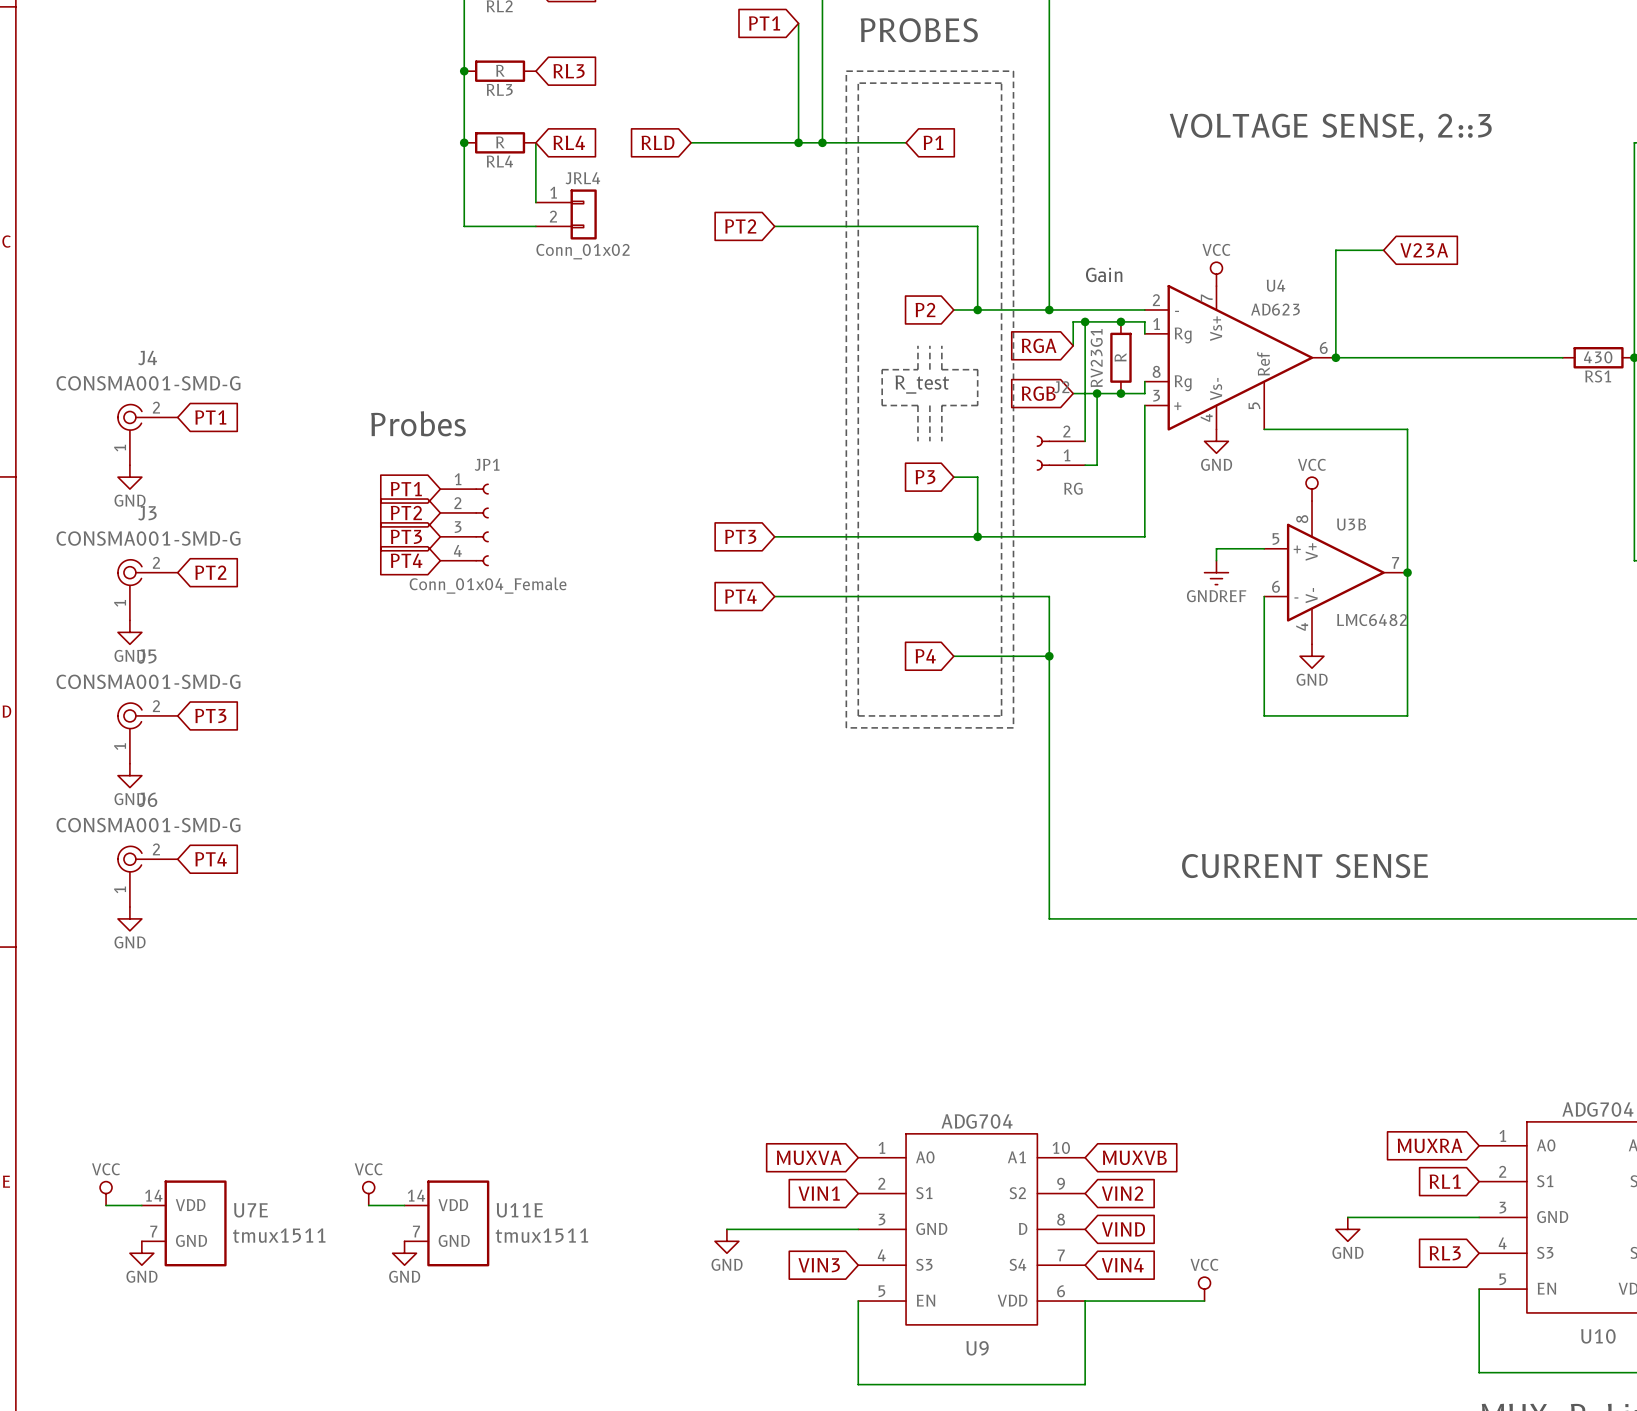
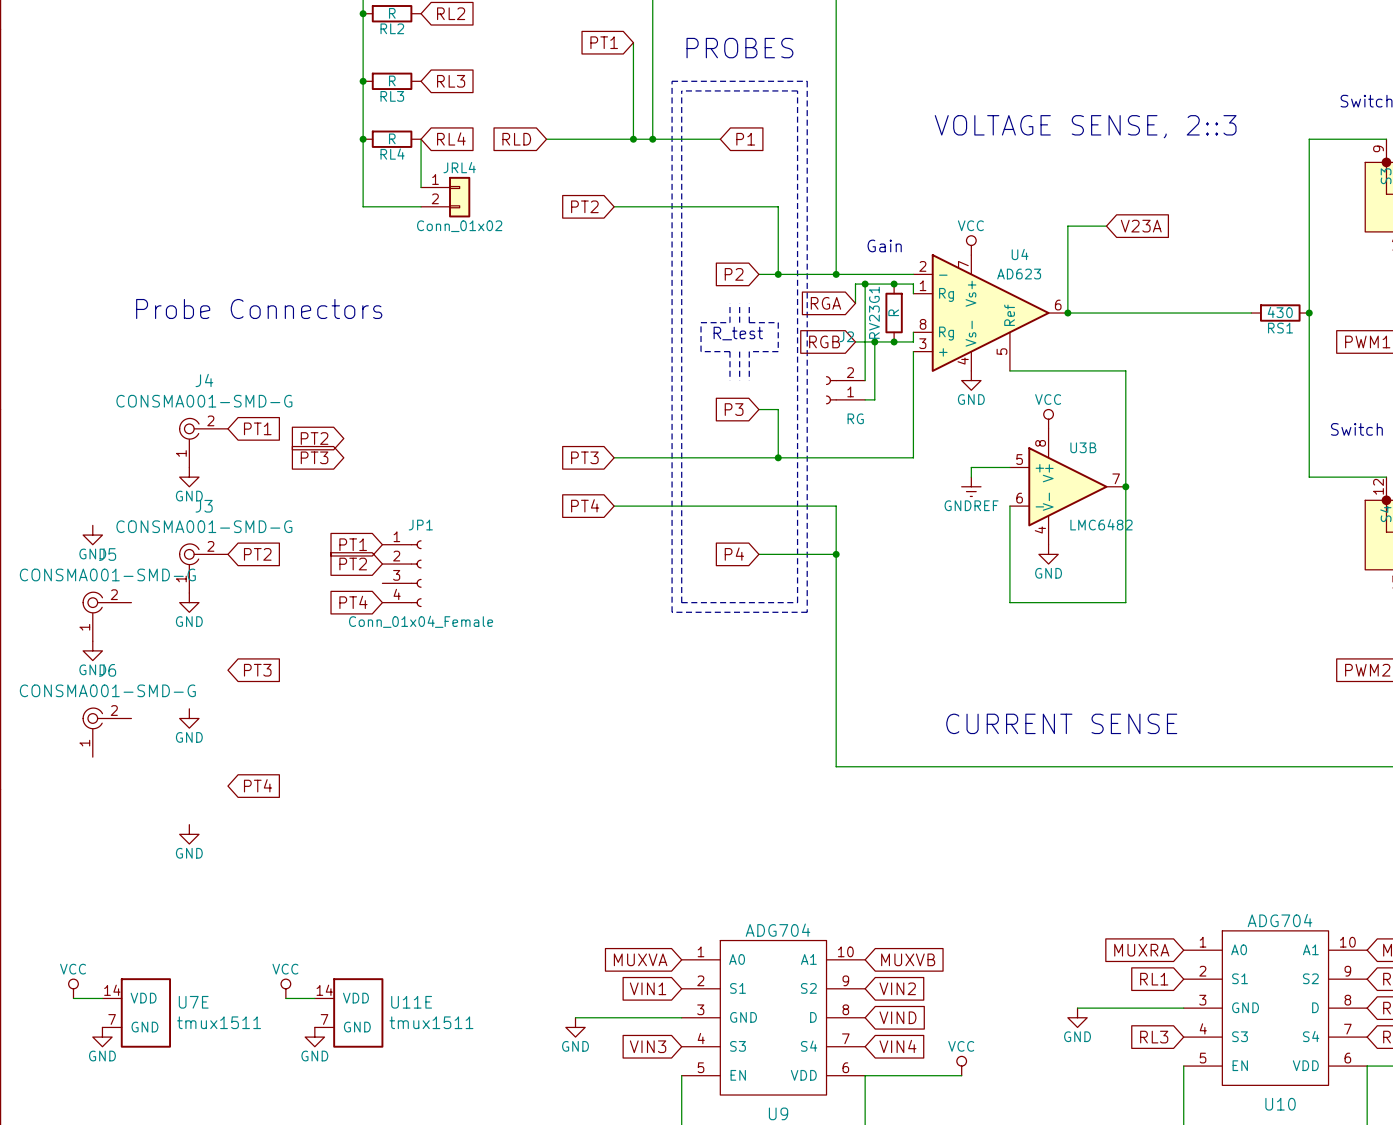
text: none -> Probe Connectors (259, 308)
global label: PT1 (210, 417) -> none
text: Probes (418, 423) -> none
J4 position: (147, 434) -> (203, 442)
power symbol: GND (129, 477) -> none
global label rotation: 0° (406, 489) -> 180° (257, 428)
JP1 position: (464, 524) -> (402, 573)
power symbol: none -> GND (189, 477)
global label position: PT4 (406, 560) -> PT4 (353, 602)
global label position: PT2 (210, 572) -> PT2 (257, 554)
J3 position: (147, 590) -> (203, 568)
global label: none -> PT1 (353, 544)
global label: none -> PT2 (353, 564)
global label position: PT3 (210, 715) -> PT3 (257, 670)
power symbol: none -> GND (189, 602)
global label position: PT4 (211, 859) -> PT4 (258, 785)
power symbol: none -> GND (189, 718)
power symbol: GND (129, 918) -> none
power symbol: none -> GND (189, 834)

